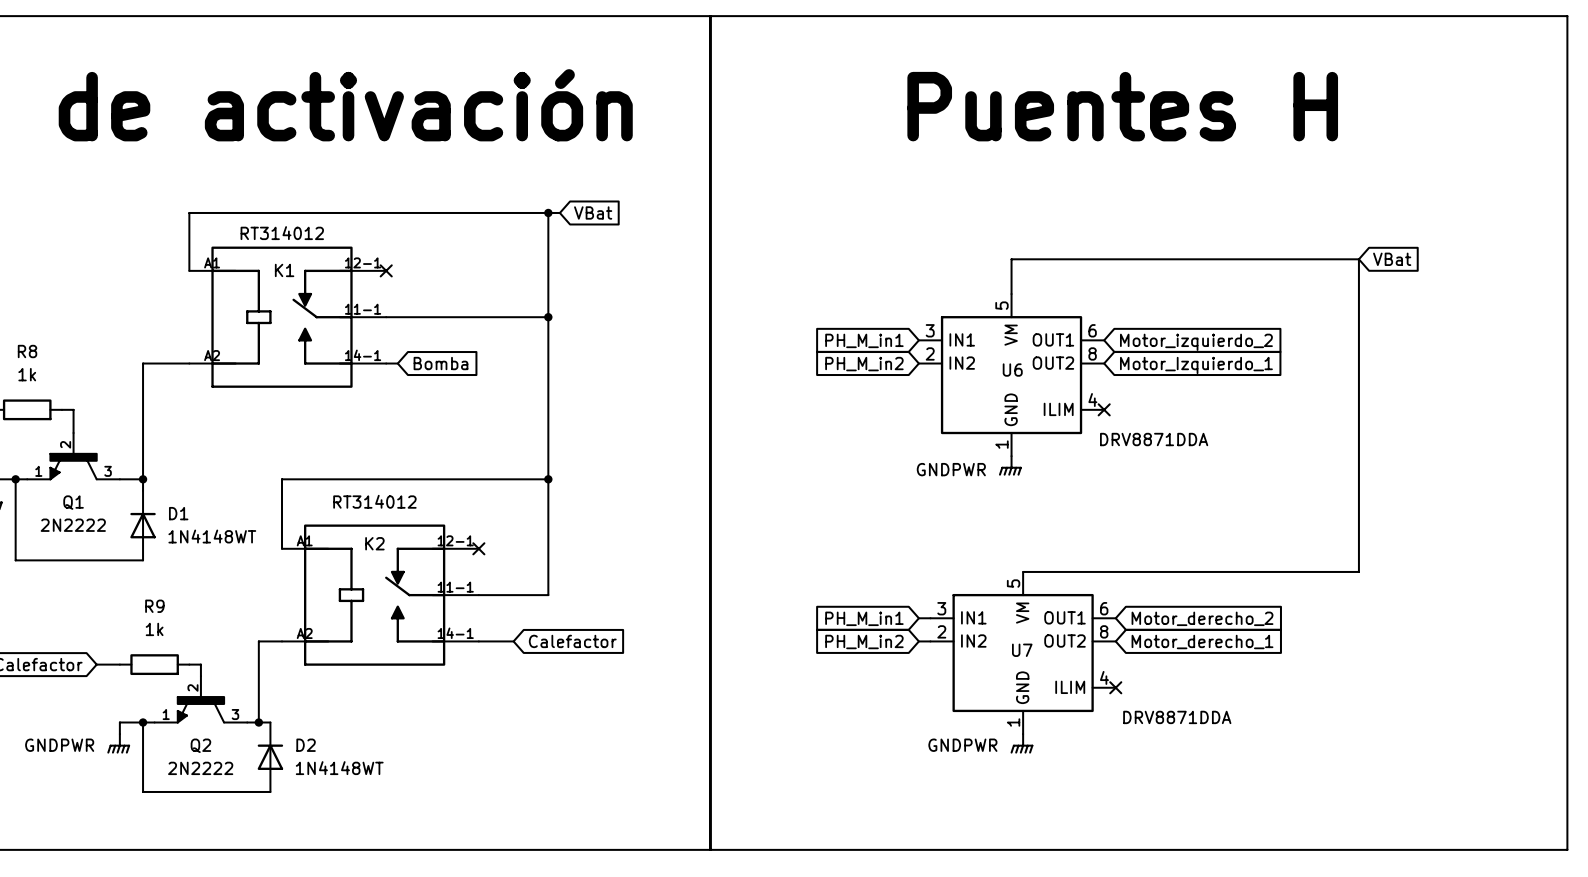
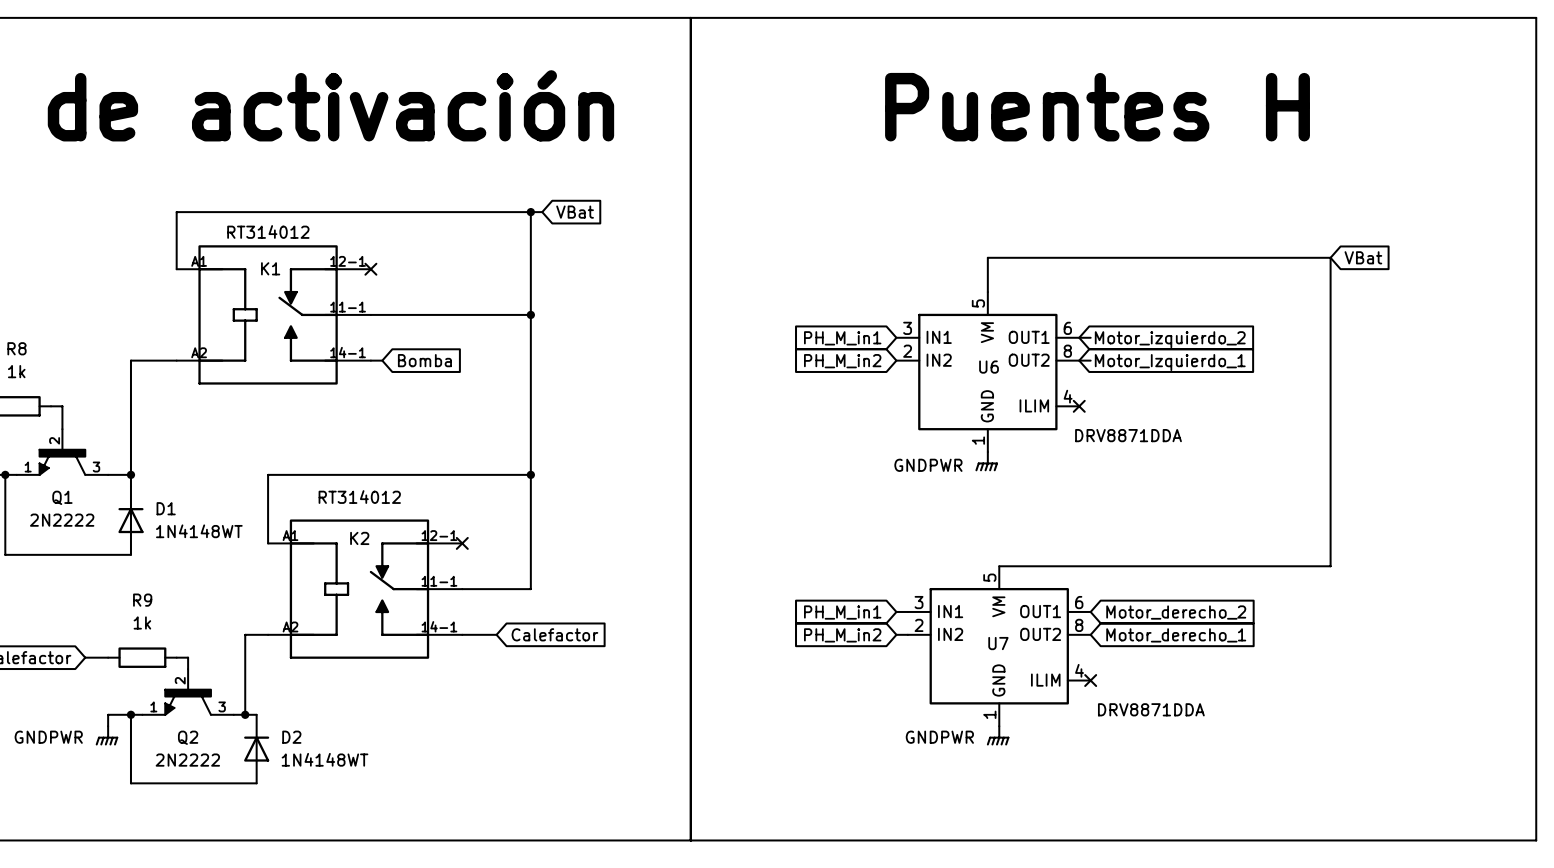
wire: none -> (1079, 337) (1090, 337)
wire: none -> (1079, 360) (1090, 360)

